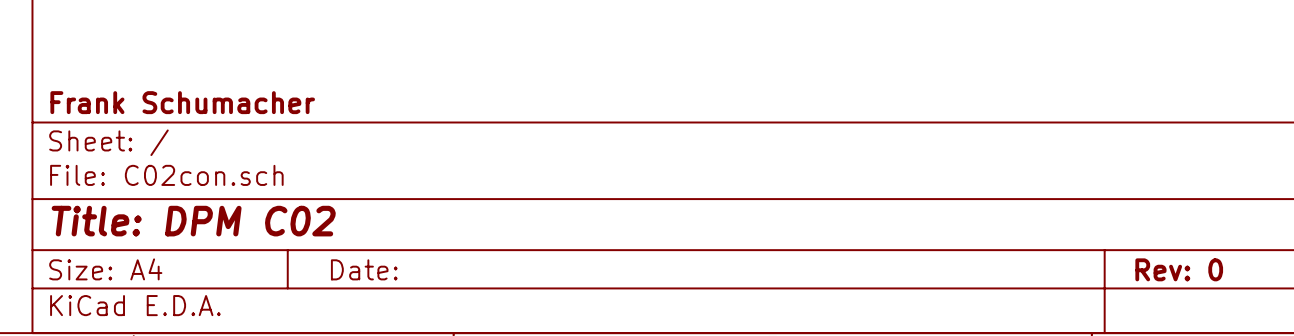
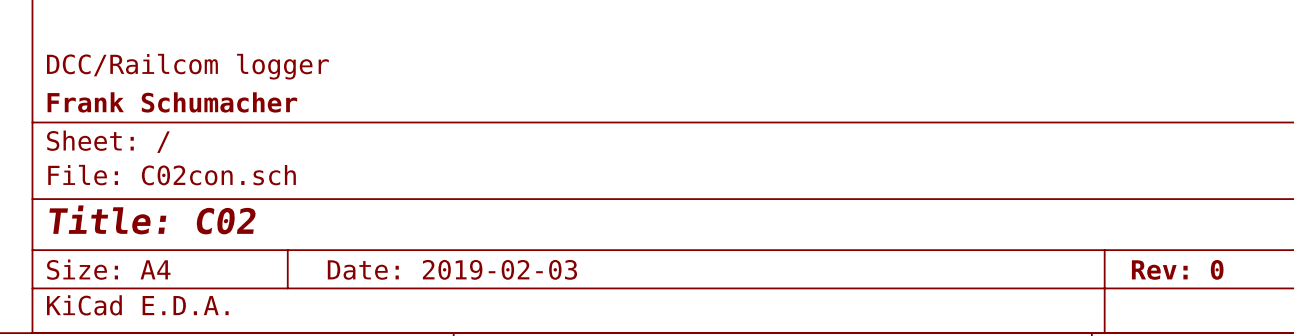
title block: none -> DCC/Railcom logger (187, 66)
title block: Title: DPM C02 (193, 221) -> Title: C02 (152, 219)
title block: Date: (364, 269) -> Date: 2019-02-03 (452, 269)

